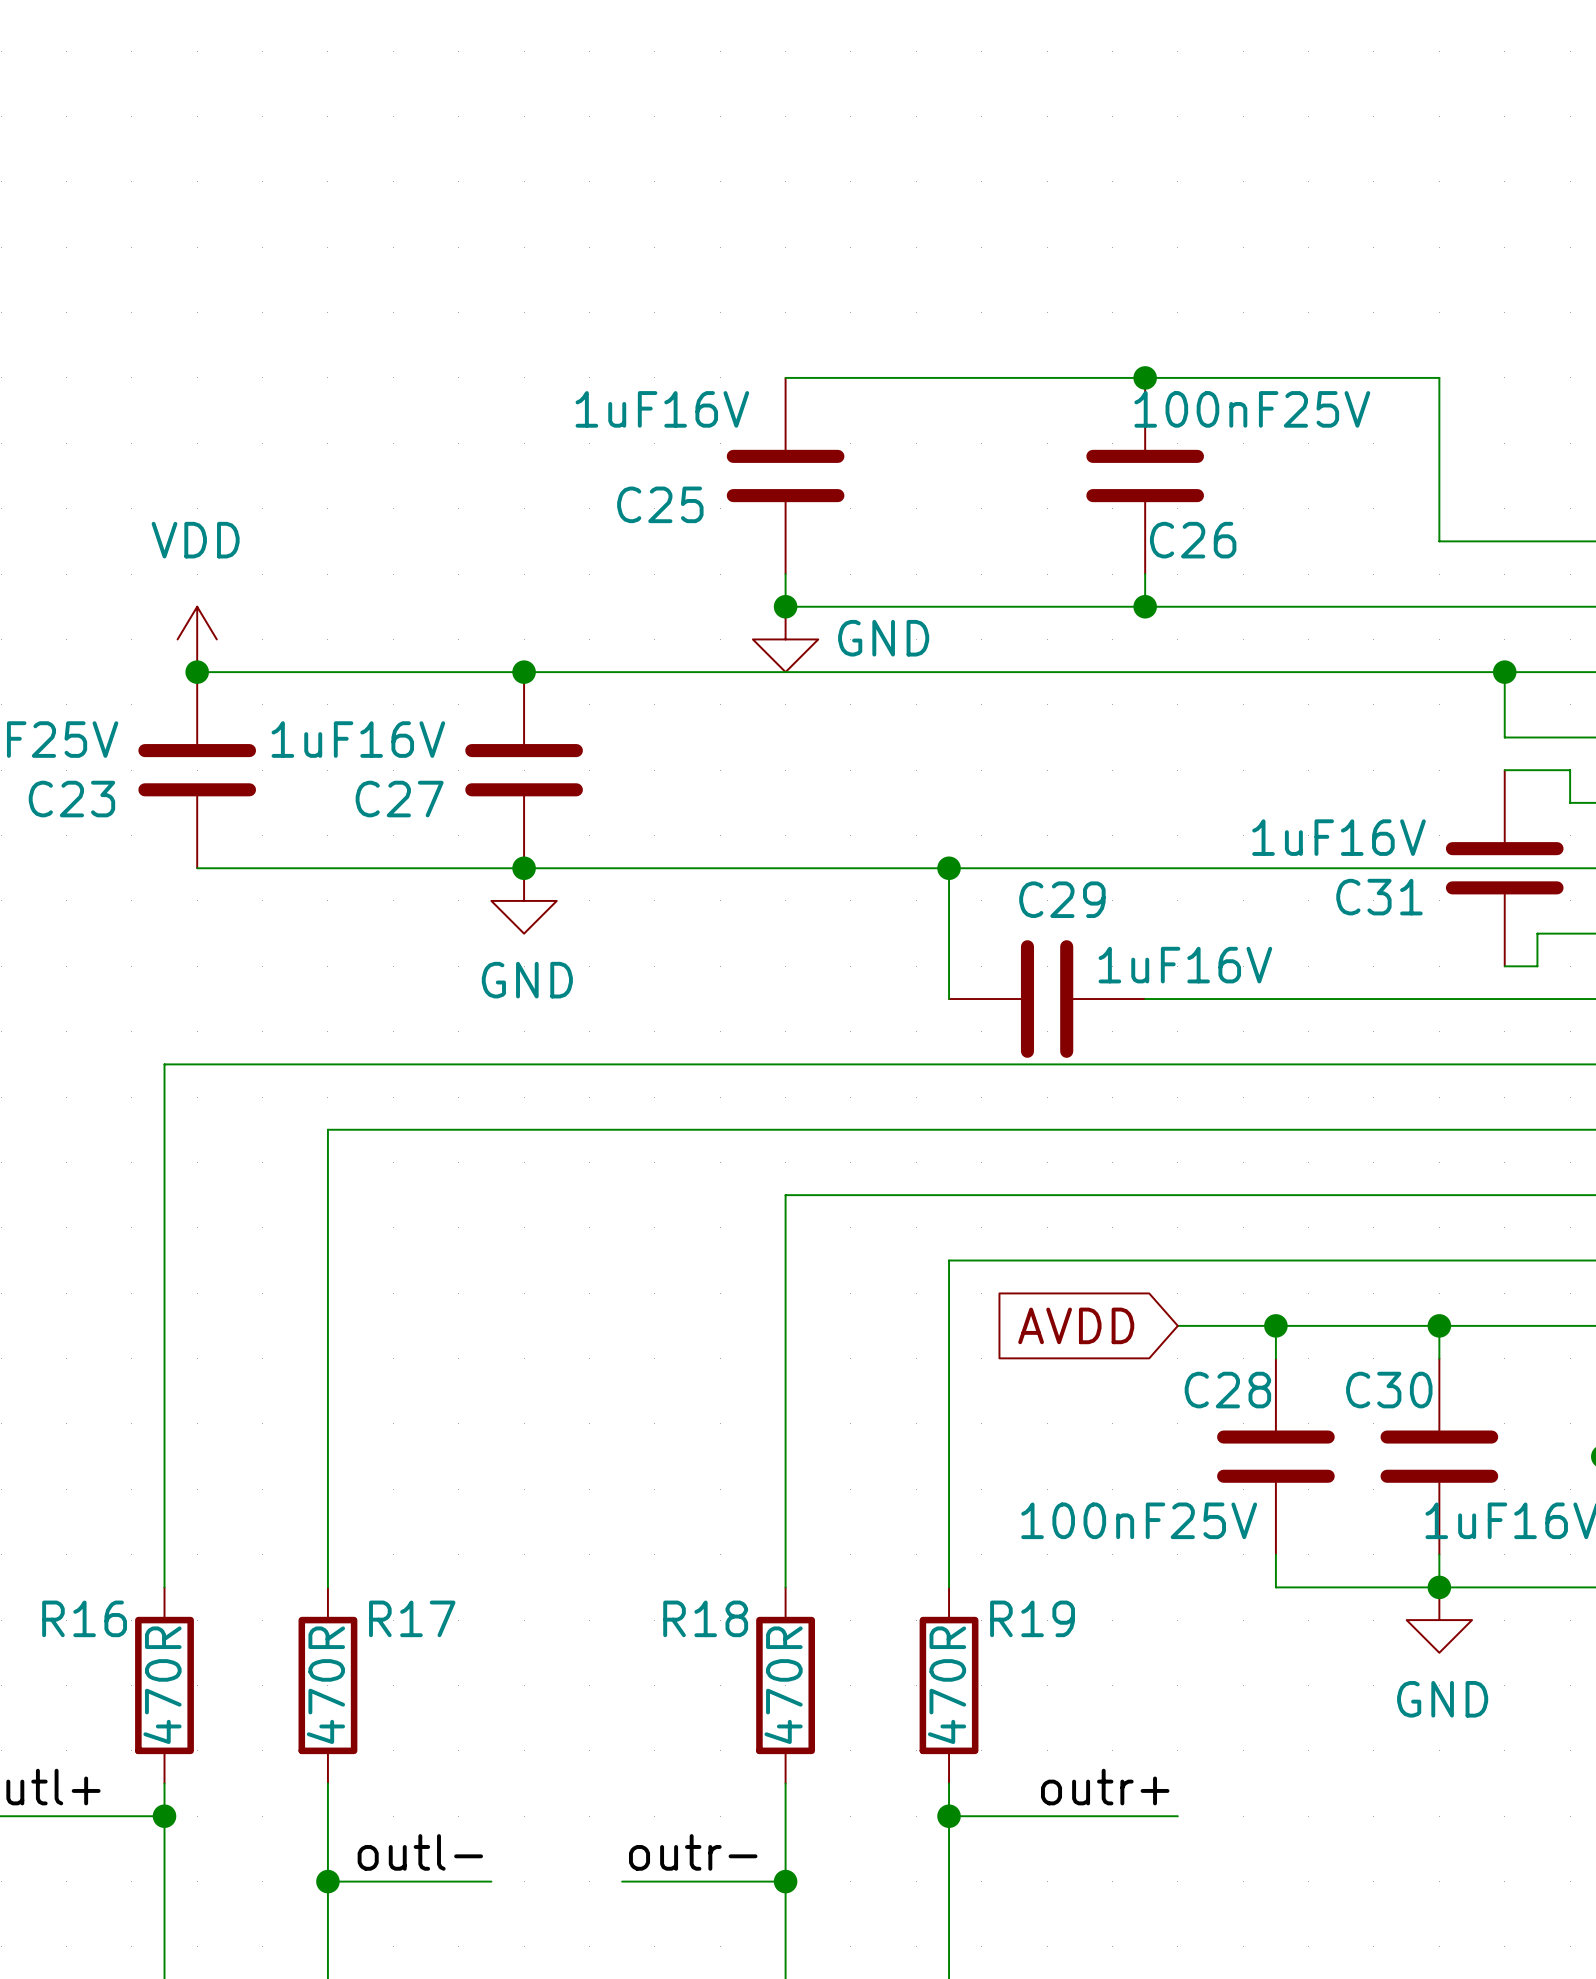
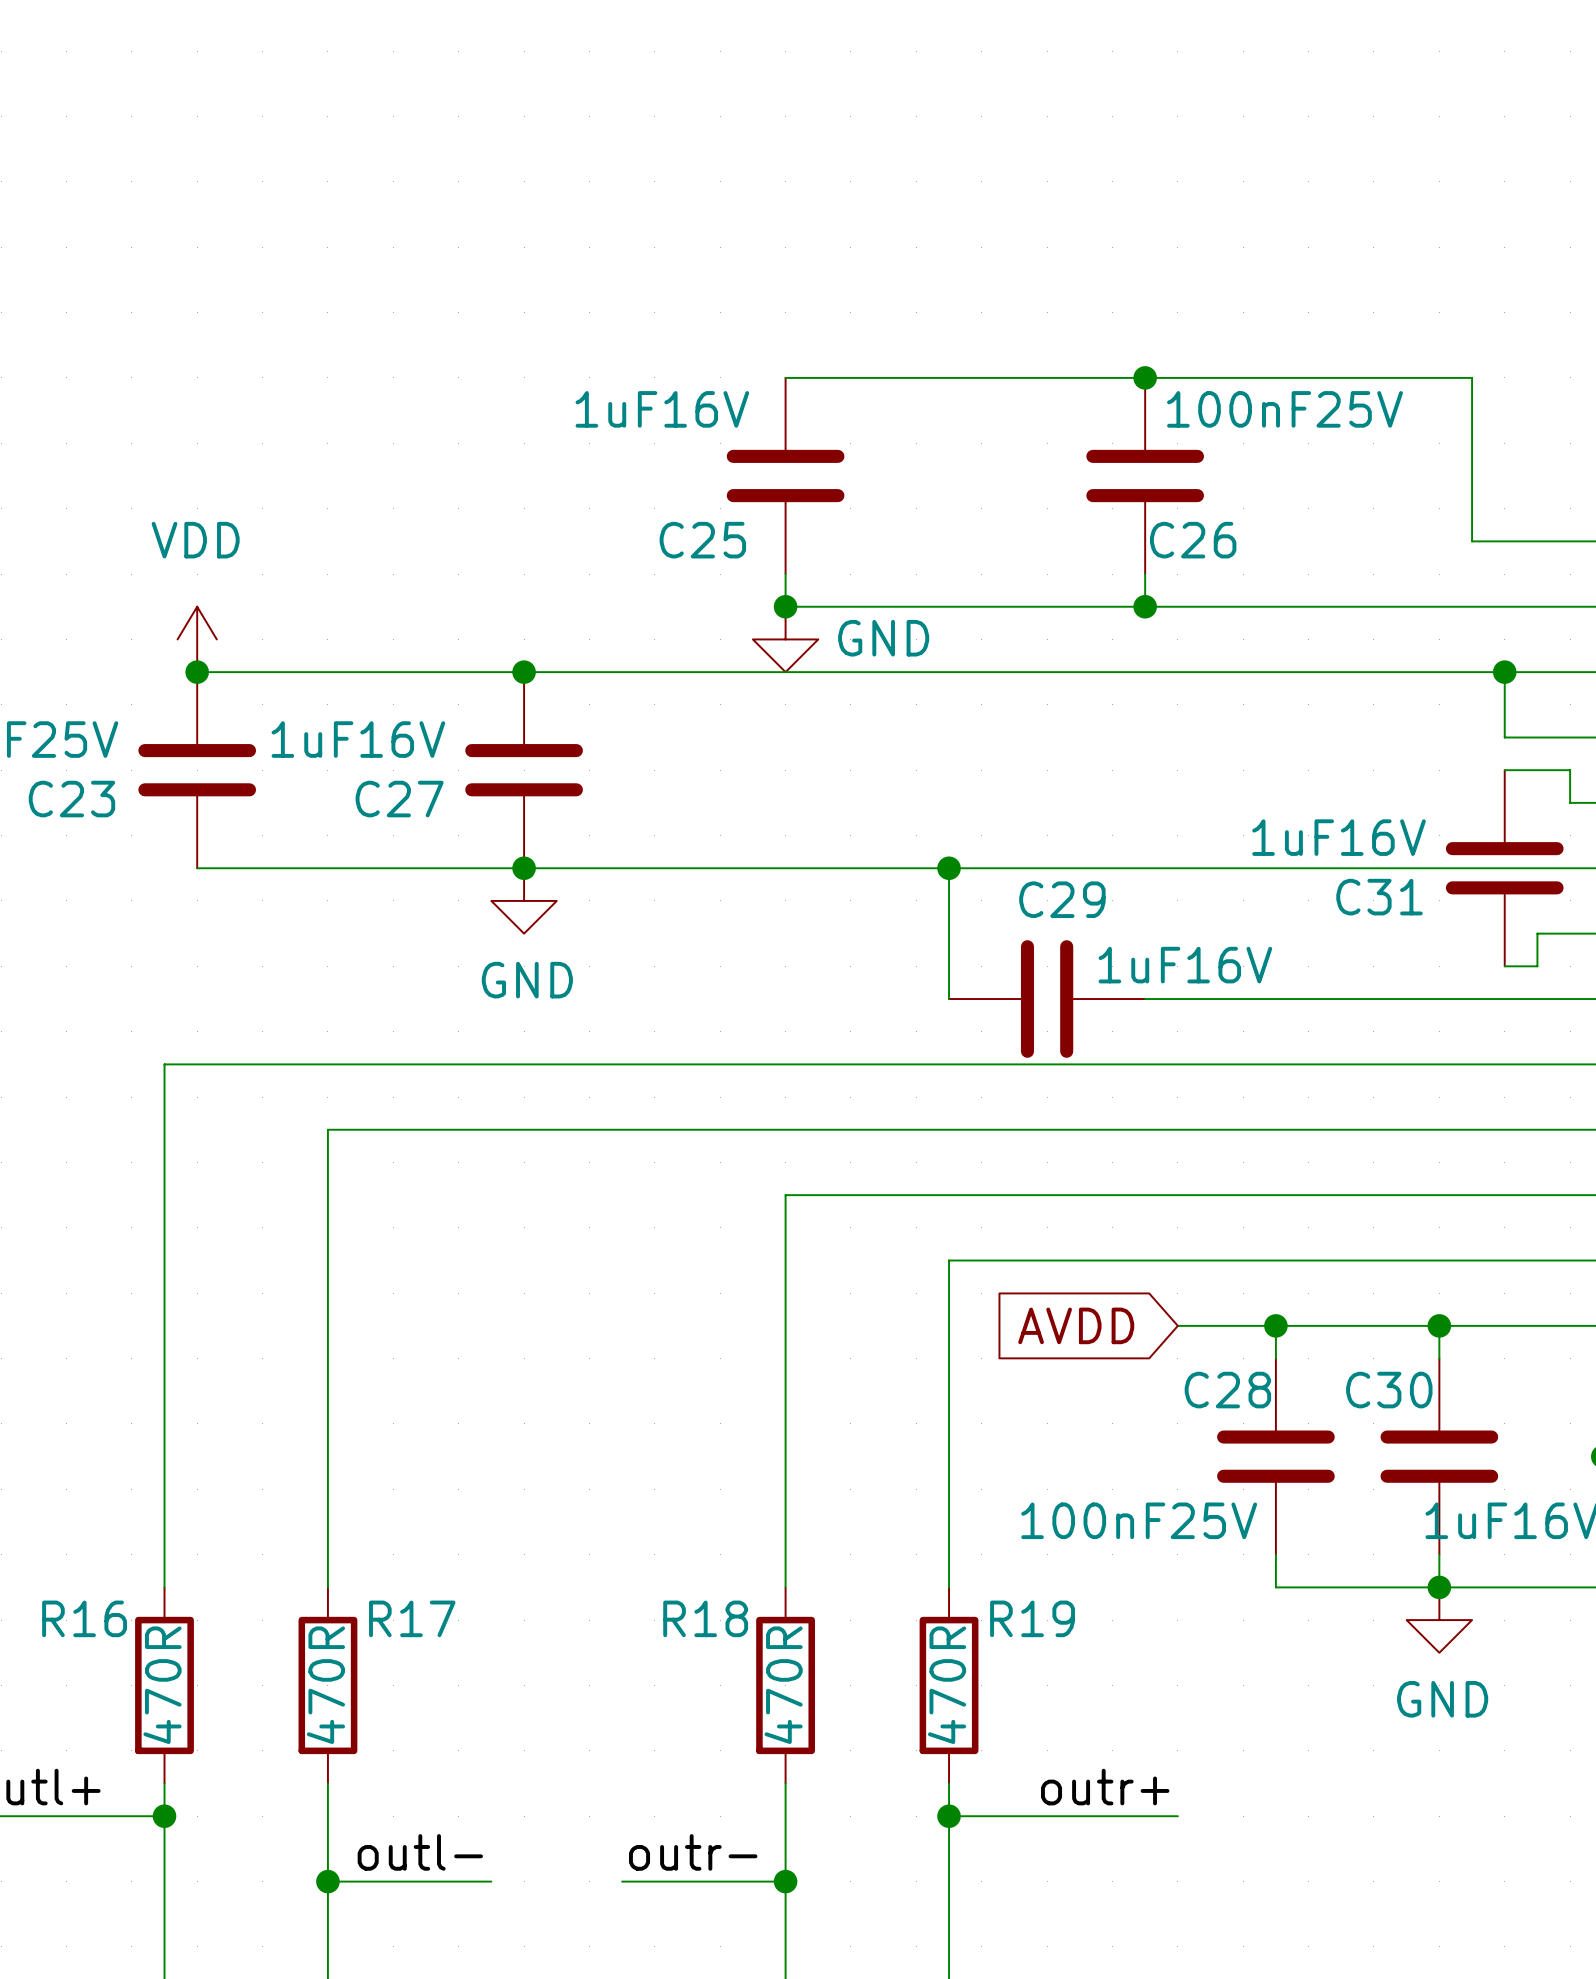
wire: (1439, 377) (1439, 541) (1472, 541) -> (1439, 377) (1472, 377) (1472, 541)
C26 value position: 100nF25V (1252, 409) -> 100nF25V (1285, 409)
C25 name position: C25 (660, 504) -> C25 (702, 540)

